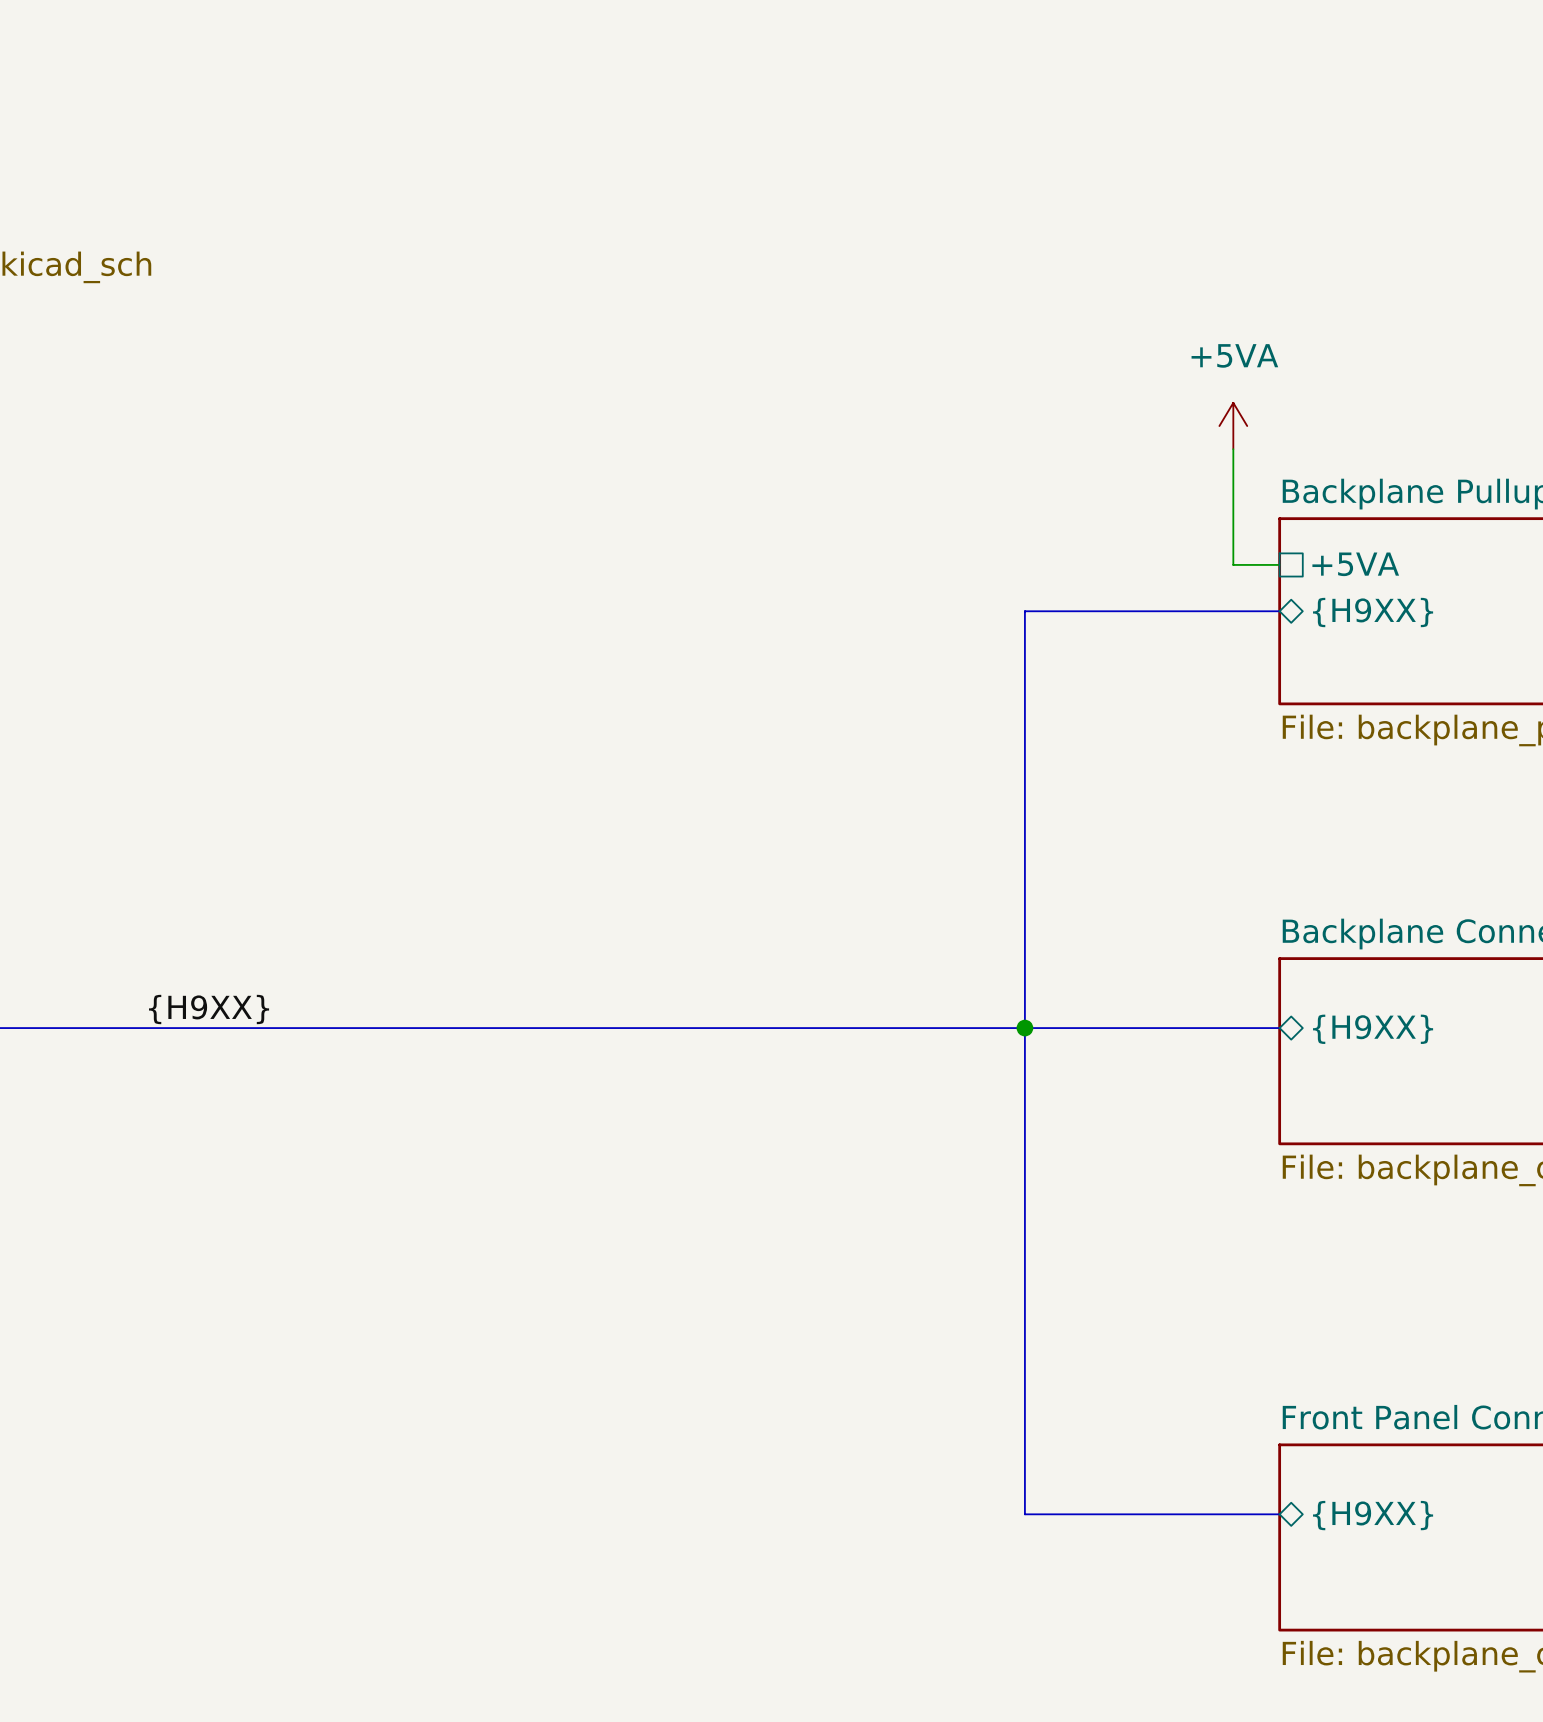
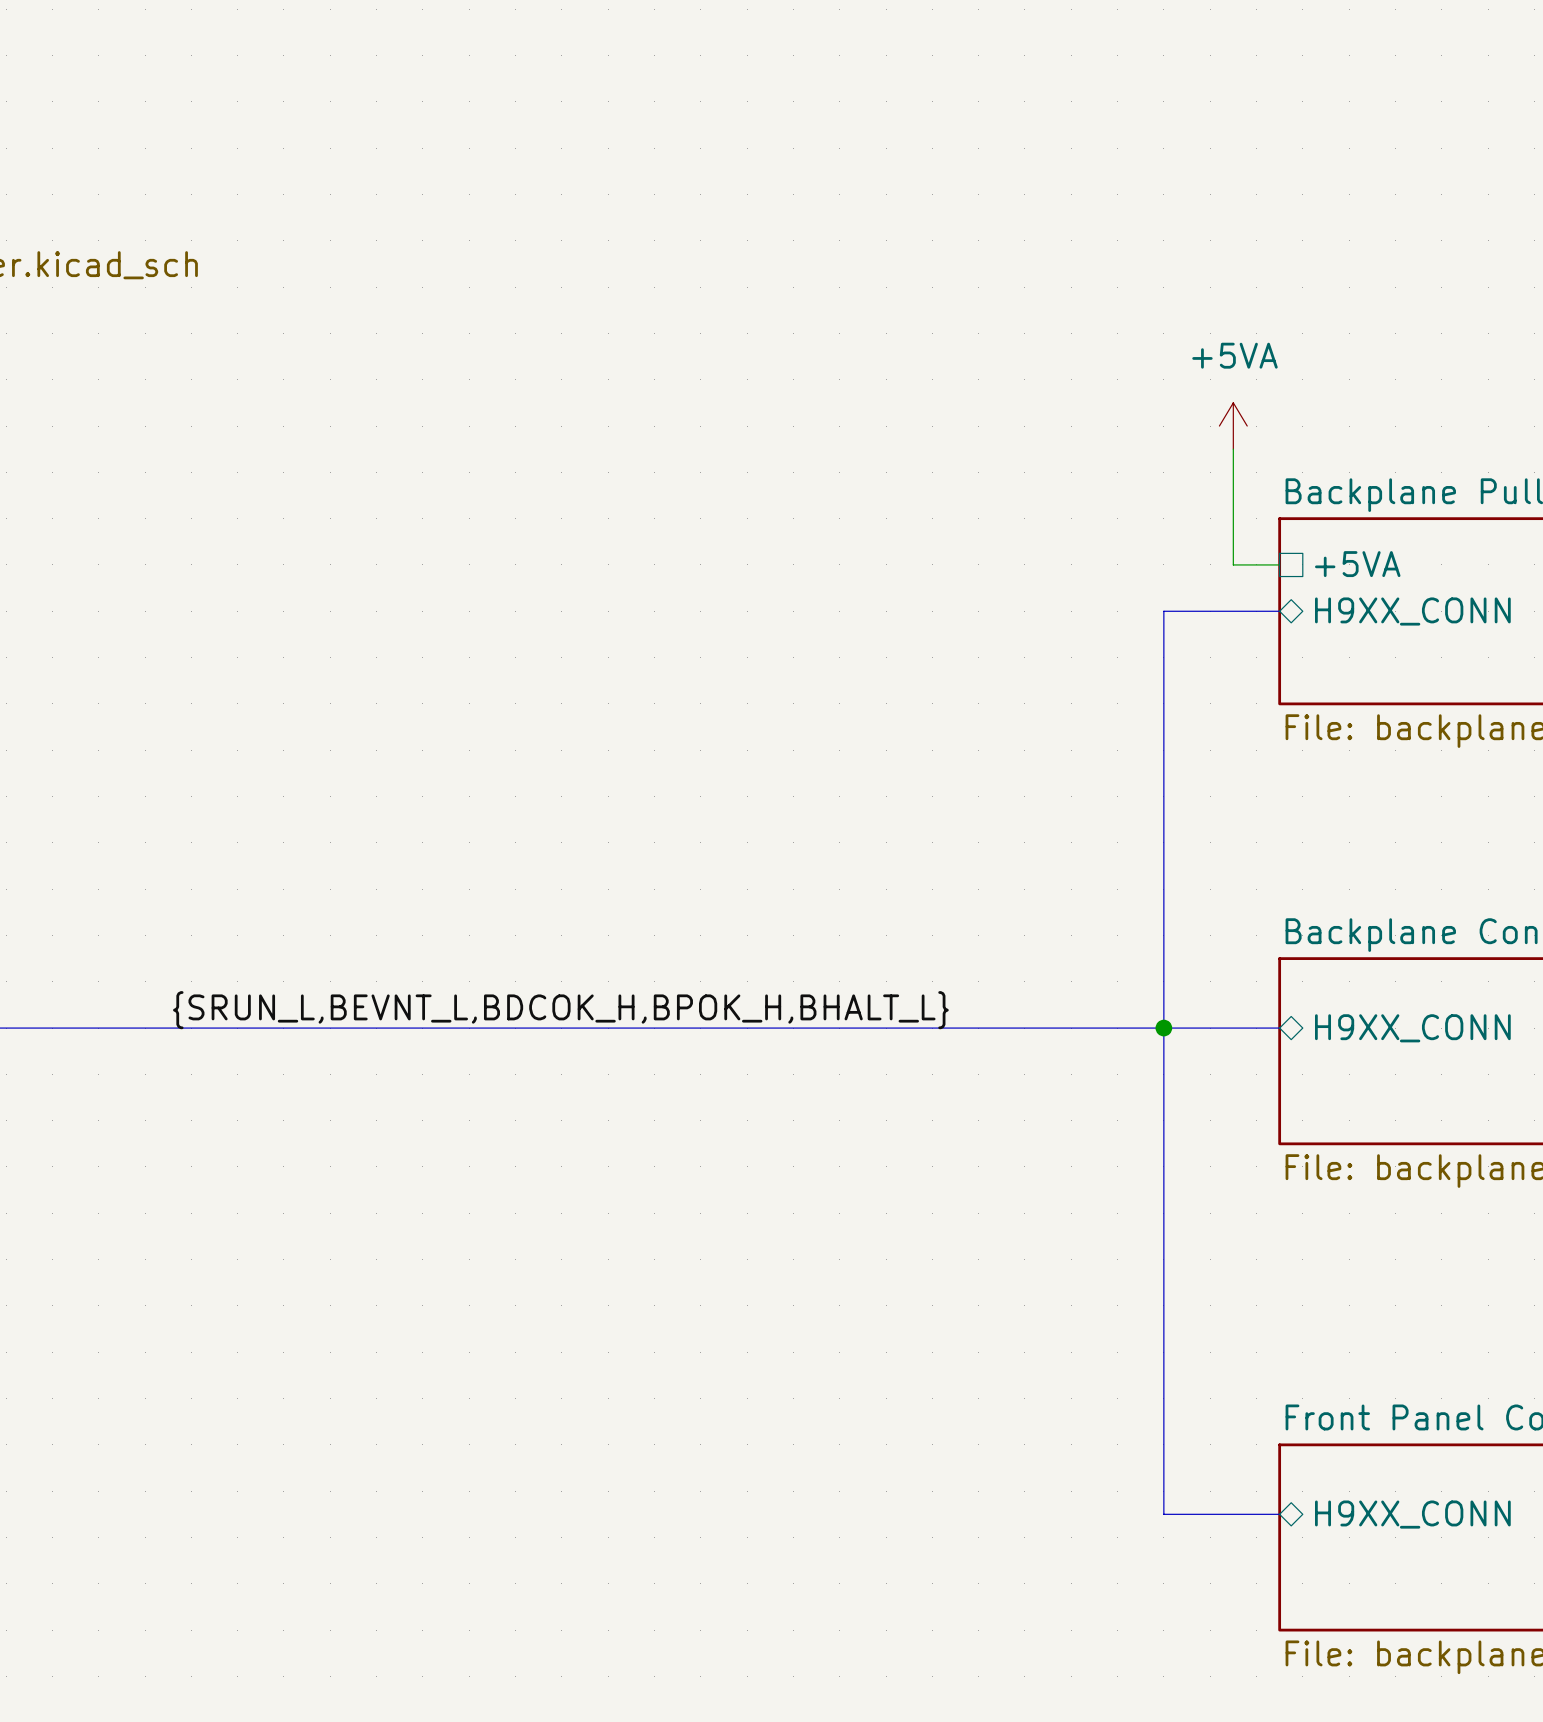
bus: (1163, 611) (1024, 611) (1024, 1514) (1163, 1514) -> (1163, 611) (1163, 1514)
sheet pin: {H9XX} (1373, 612) -> H9XX_CONN (1412, 611)
label: {H9XX} (209, 1009) -> none
label: none -> {SRUN_L,BEVNT_L,BDCOK_H,BPOK_H,BHALT_L} (560, 1010)
junction: (1024, 1028) -> none
junction: none -> (1163, 1028)
sheet pin: {H9XX} (1373, 1029) -> H9XX_CONN (1412, 1028)
sheet pin: {H9XX} (1373, 1515) -> H9XX_CONN (1412, 1514)

